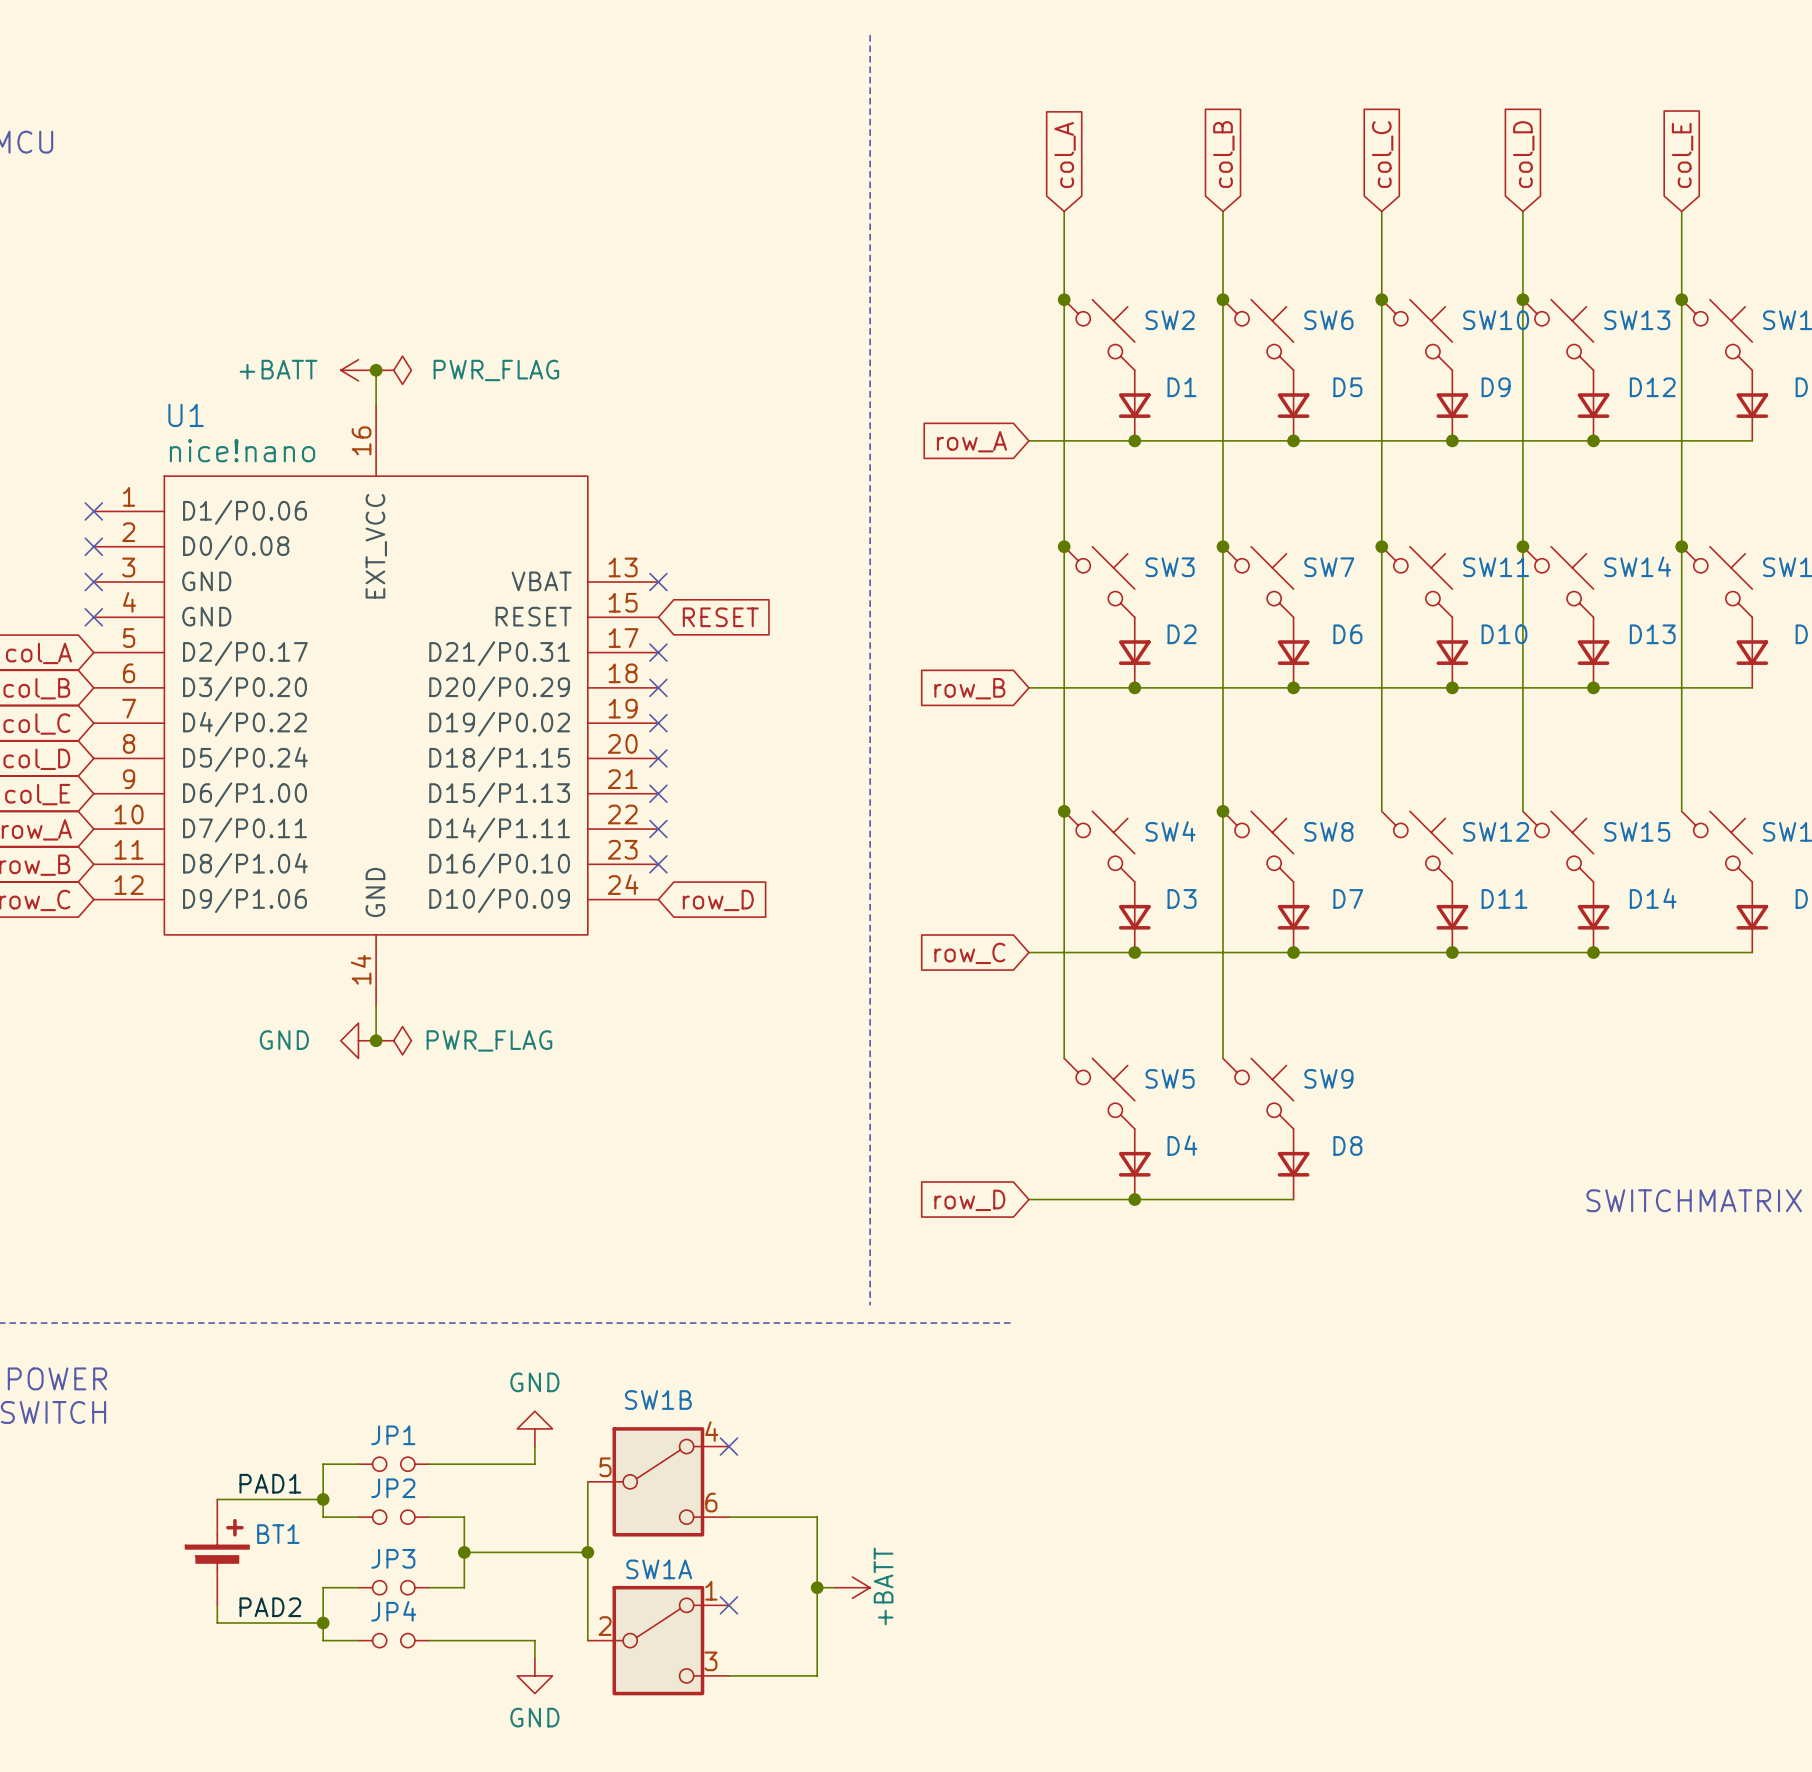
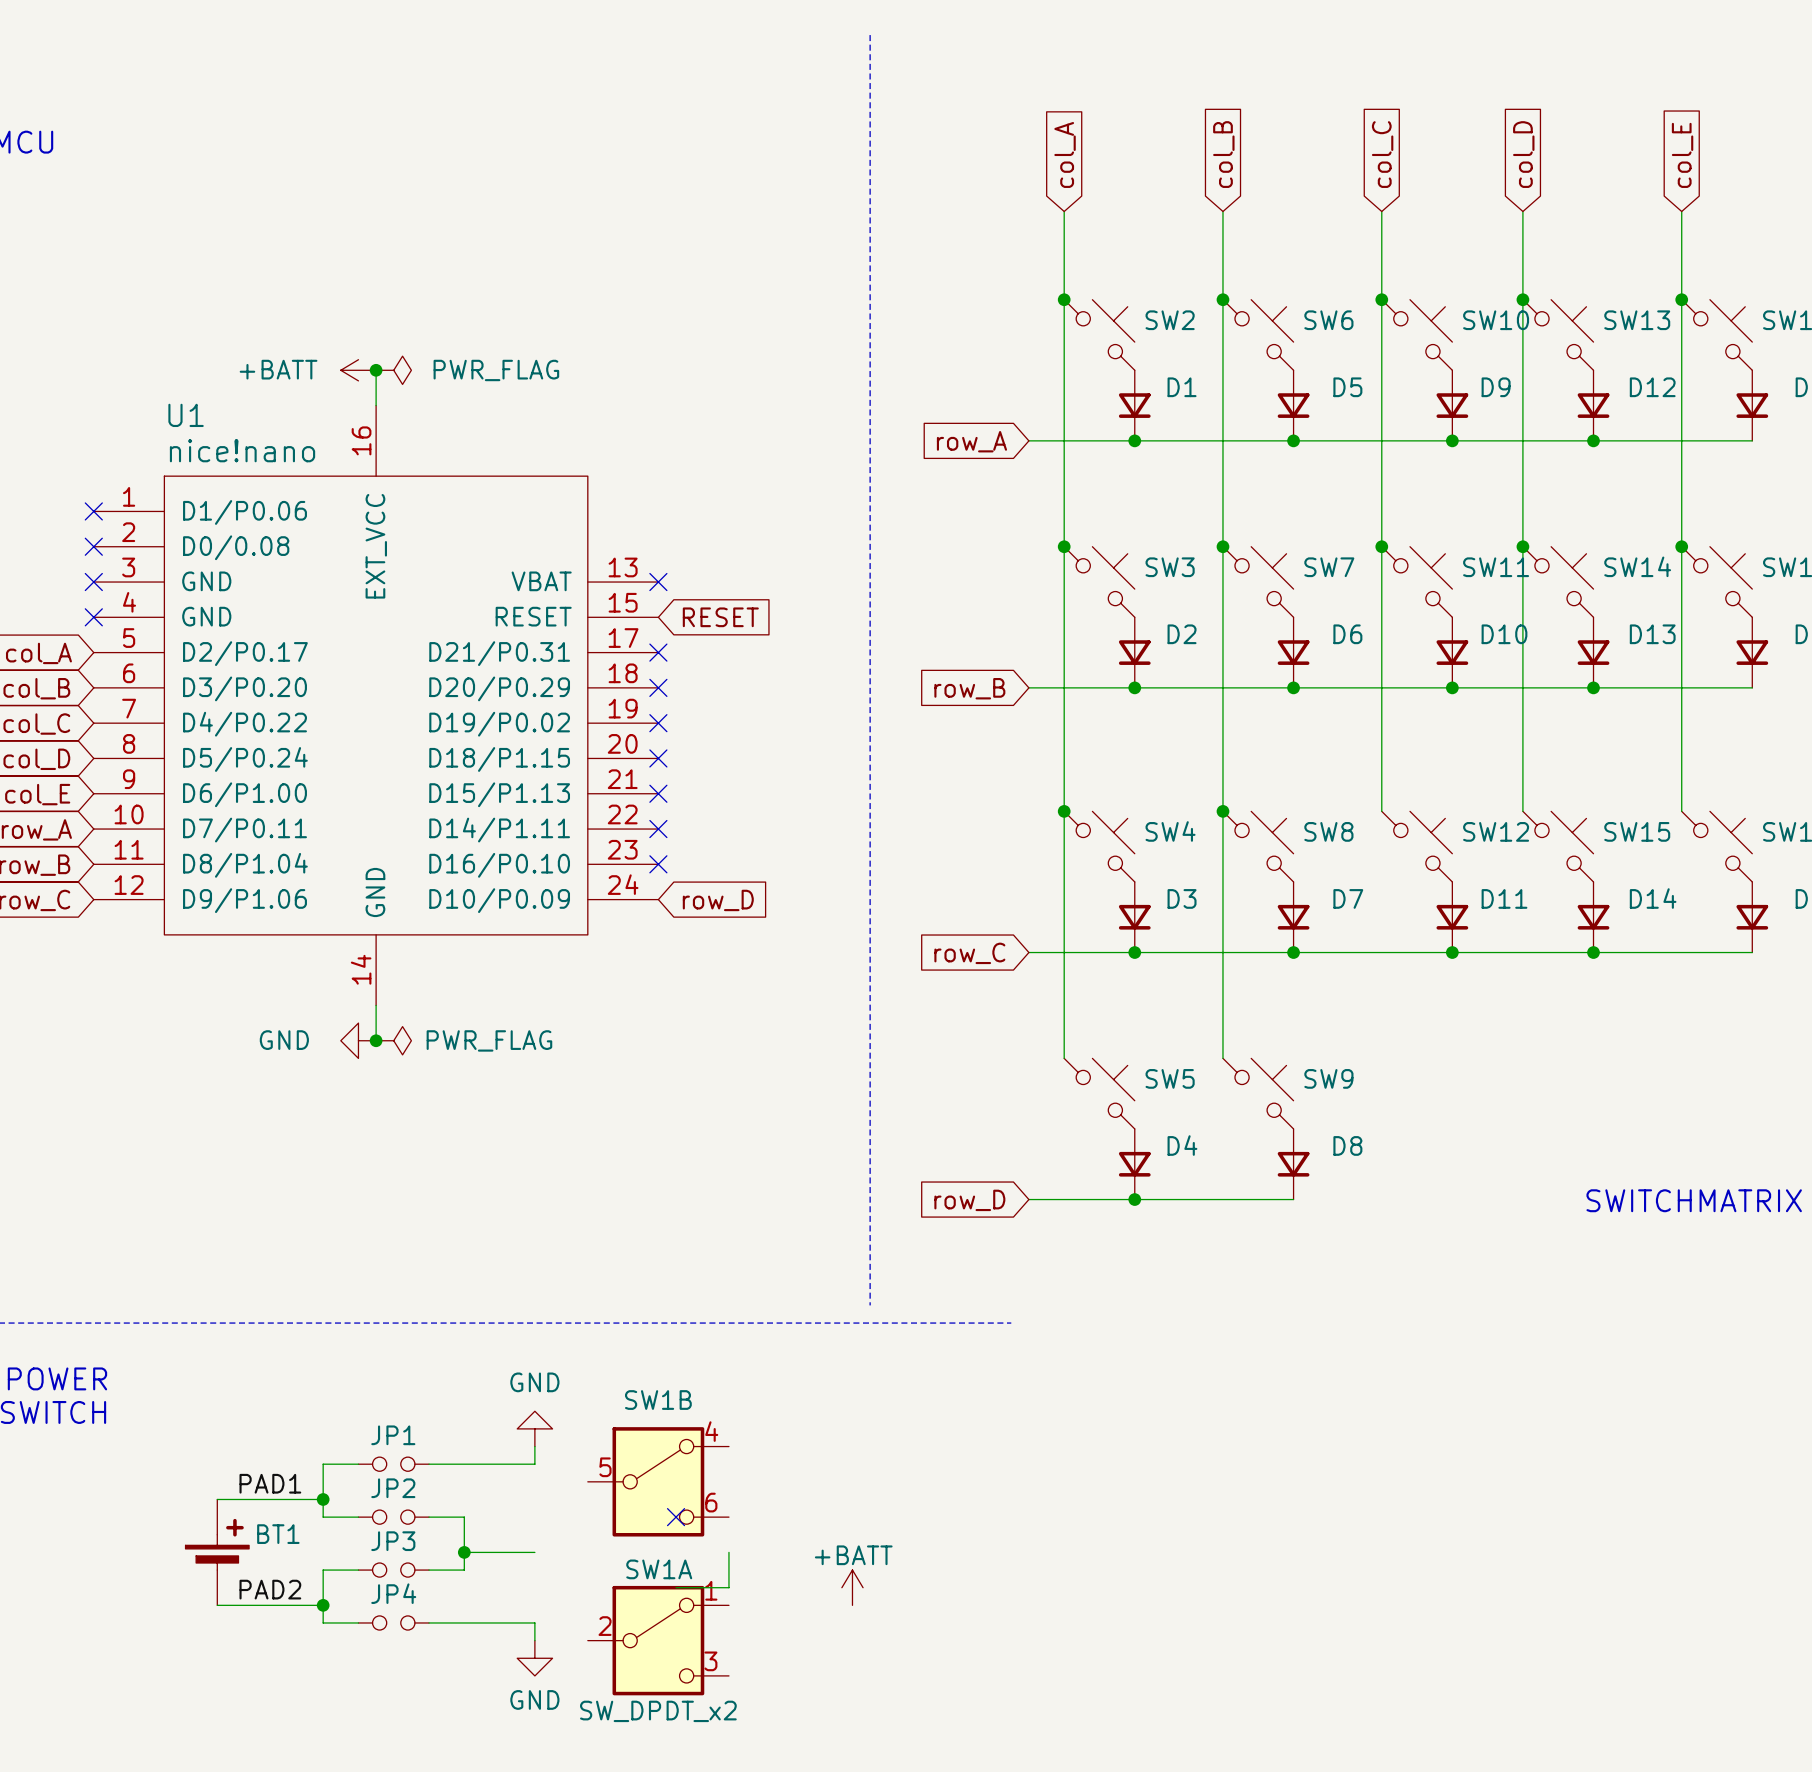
no-connect mark: (728, 1446) -> none
wire: (587, 1481) (587, 1640) -> none
no-connect mark: none -> (676, 1517)
wire: (728, 1517) (817, 1517) (817, 1675) (728, 1675) -> none
wire: (534, 1552) (587, 1552) -> none
junction: (587, 1552) -> none
wire: none -> (728, 1552) (728, 1587) (676, 1587)
wire: (464, 1570) (464, 1587) (429, 1587) -> (464, 1570) (429, 1570)
wire: (323, 1587) (358, 1587) -> (323, 1587) (323, 1570) (358, 1570)
JP3 position: (393, 1587) -> (393, 1570)
wire: (817, 1587) (834, 1587) -> none
junction: (817, 1587) -> none
power symbol rotation: 0° (852, 1587) -> 90° counterclockwise (852, 1587)
wire: (217, 1605) (217, 1622) (323, 1622) (323, 1640) (358, 1640) -> (217, 1605) (323, 1605)
no-connect mark: (728, 1605) -> none
label position: PAD2 (270, 1607) -> PAD2 (270, 1589)
wire: none -> (323, 1622) (358, 1622)
junction position: (323, 1622) -> (323, 1605)
JP4 position: (393, 1640) -> (393, 1622)
wire: (429, 1640) (534, 1640) (534, 1658) -> (429, 1622) (534, 1622) (534, 1640)
power symbol position: GND (534, 1675) -> GND (534, 1658)
SW1A value: none -> SW_DPDT_x2 (658, 1711)

